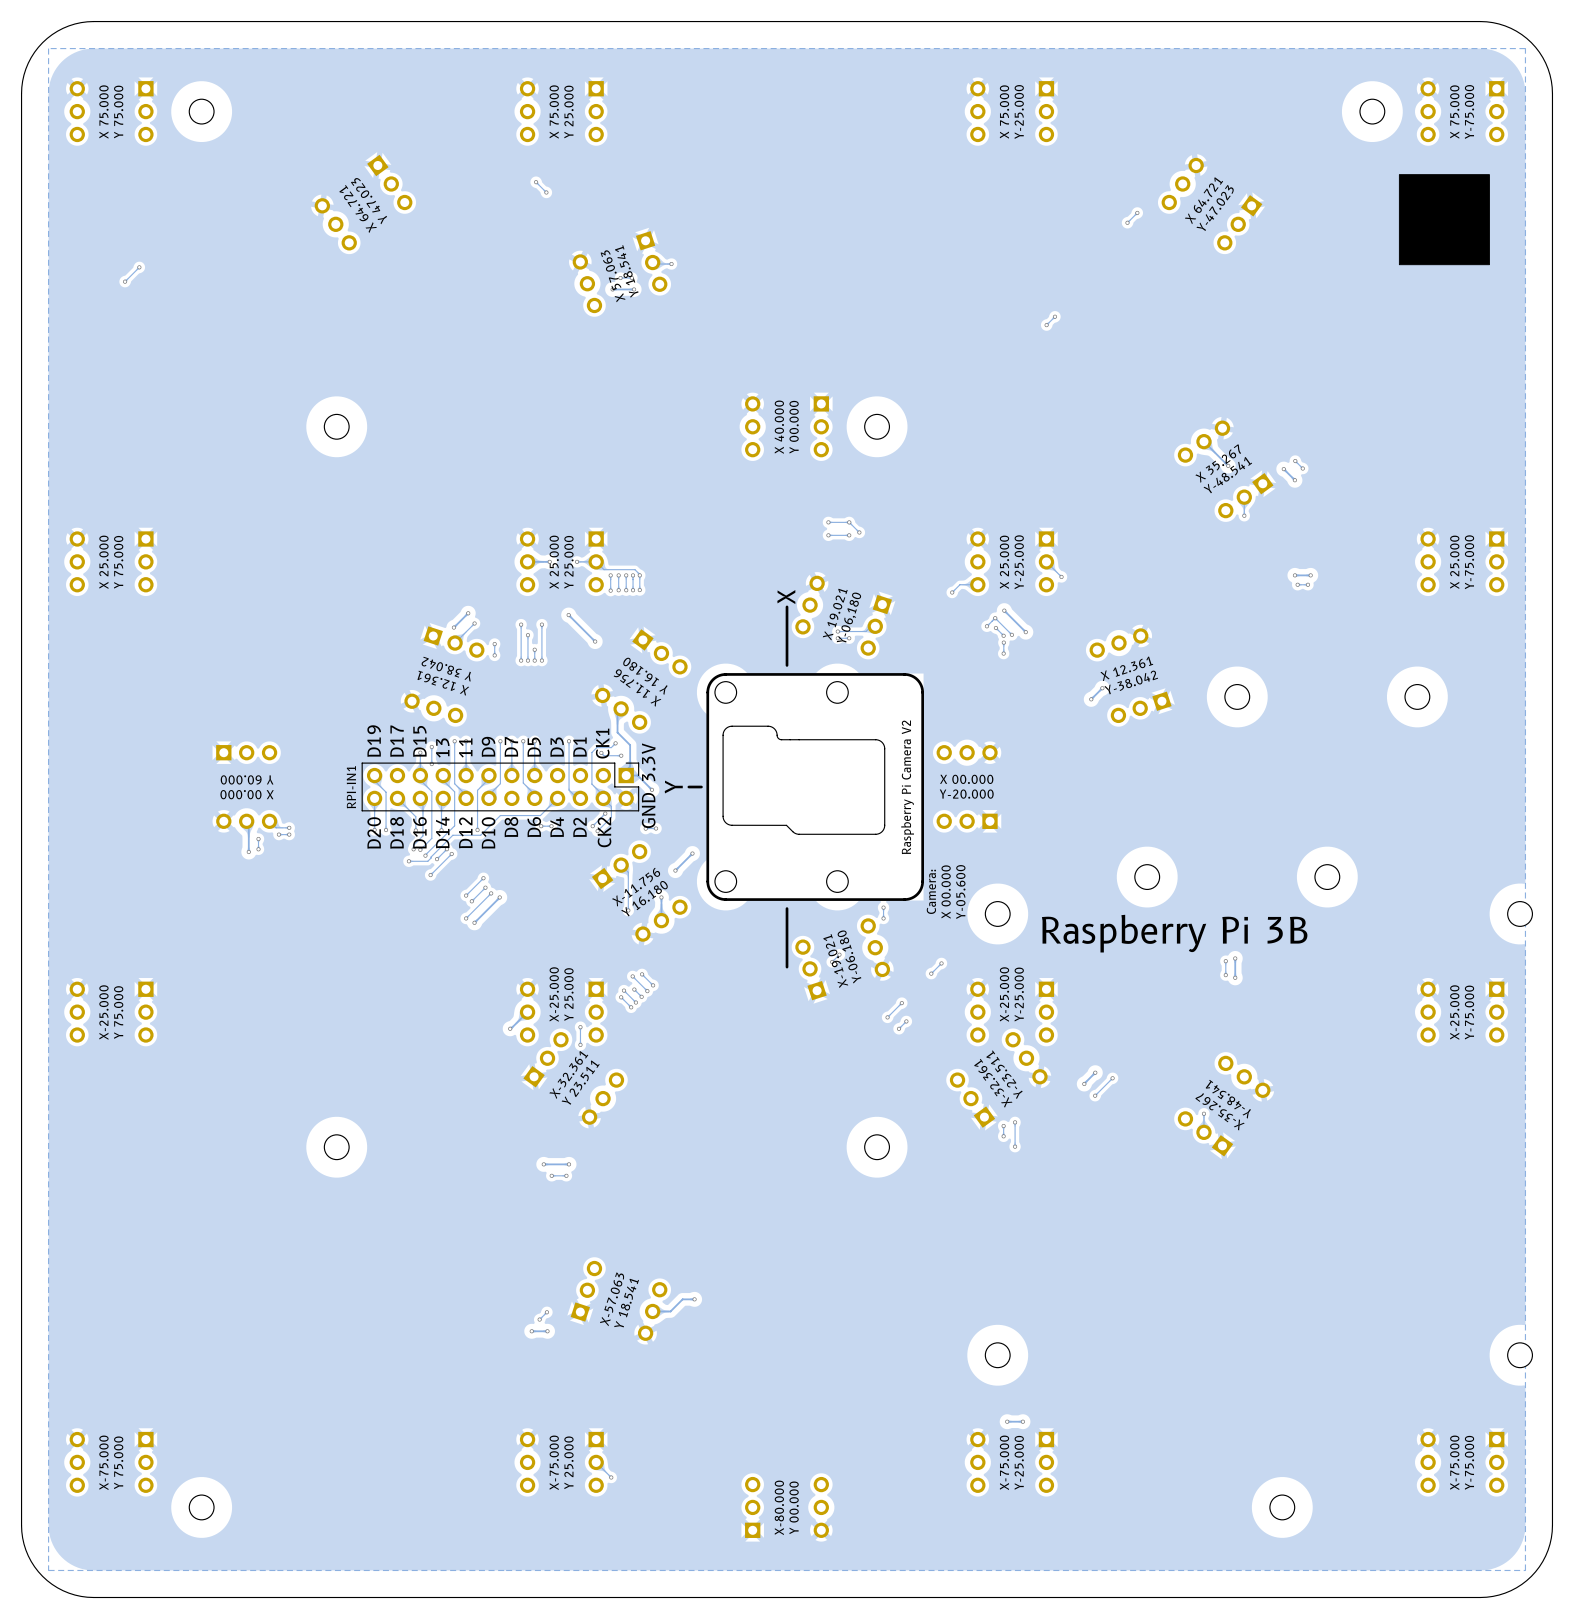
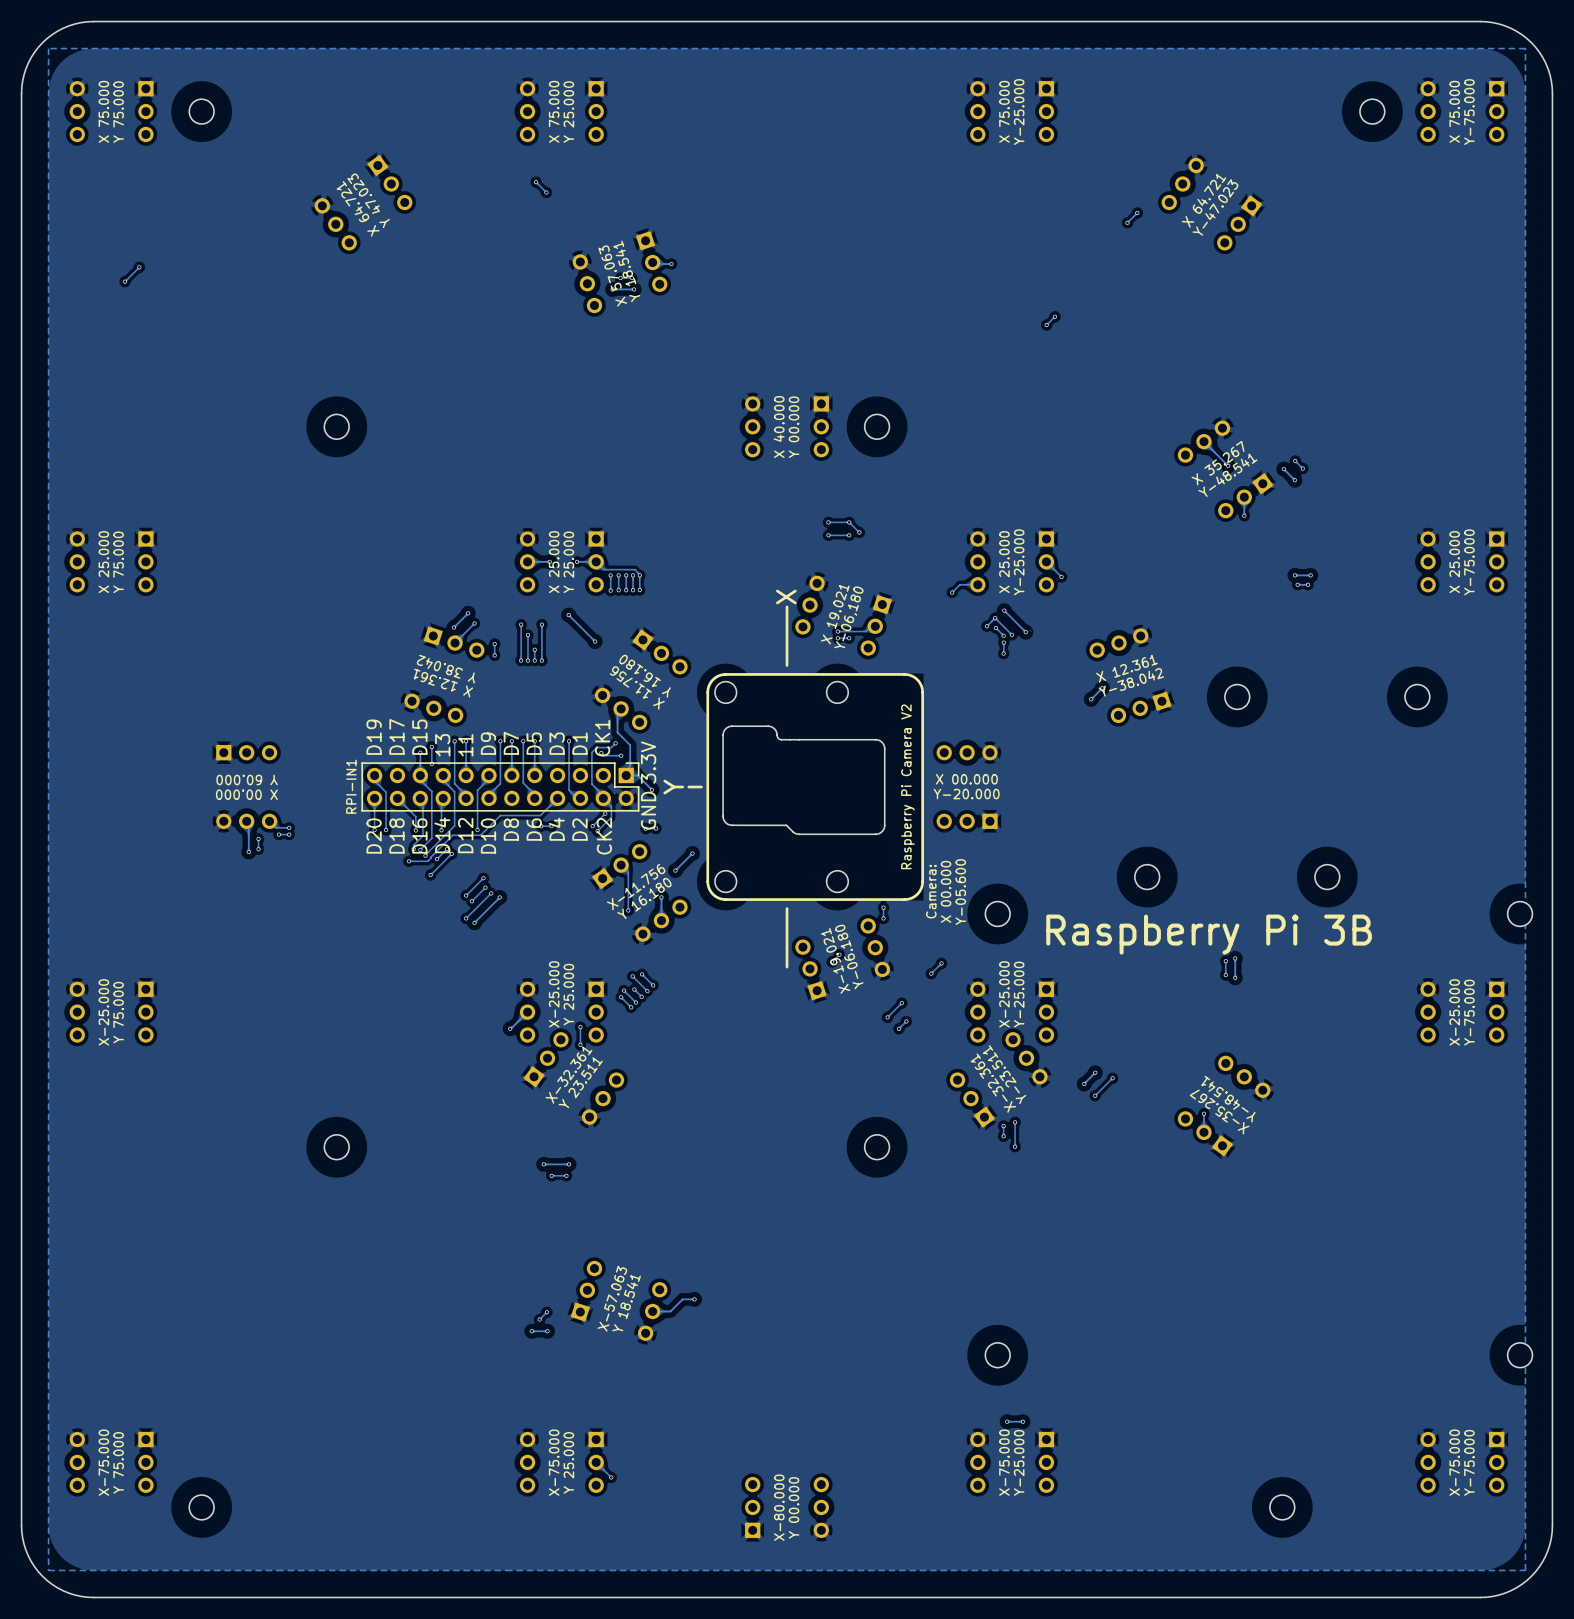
drawing: [1398, 174, 1490, 266] -> none

